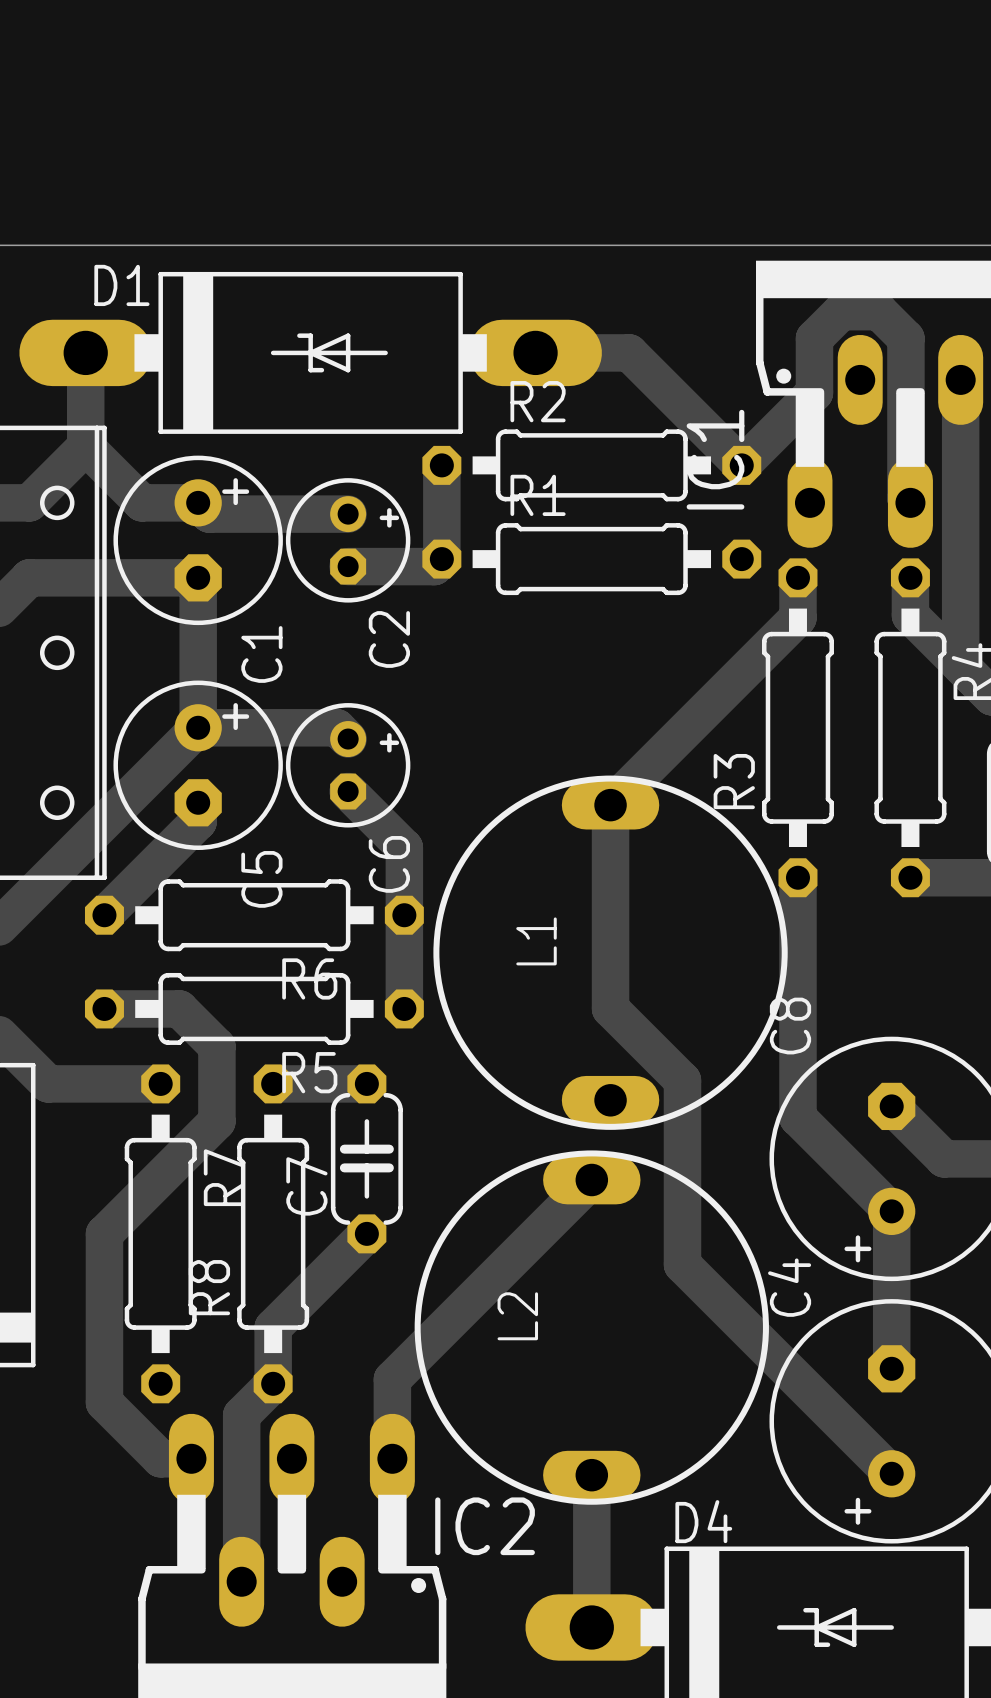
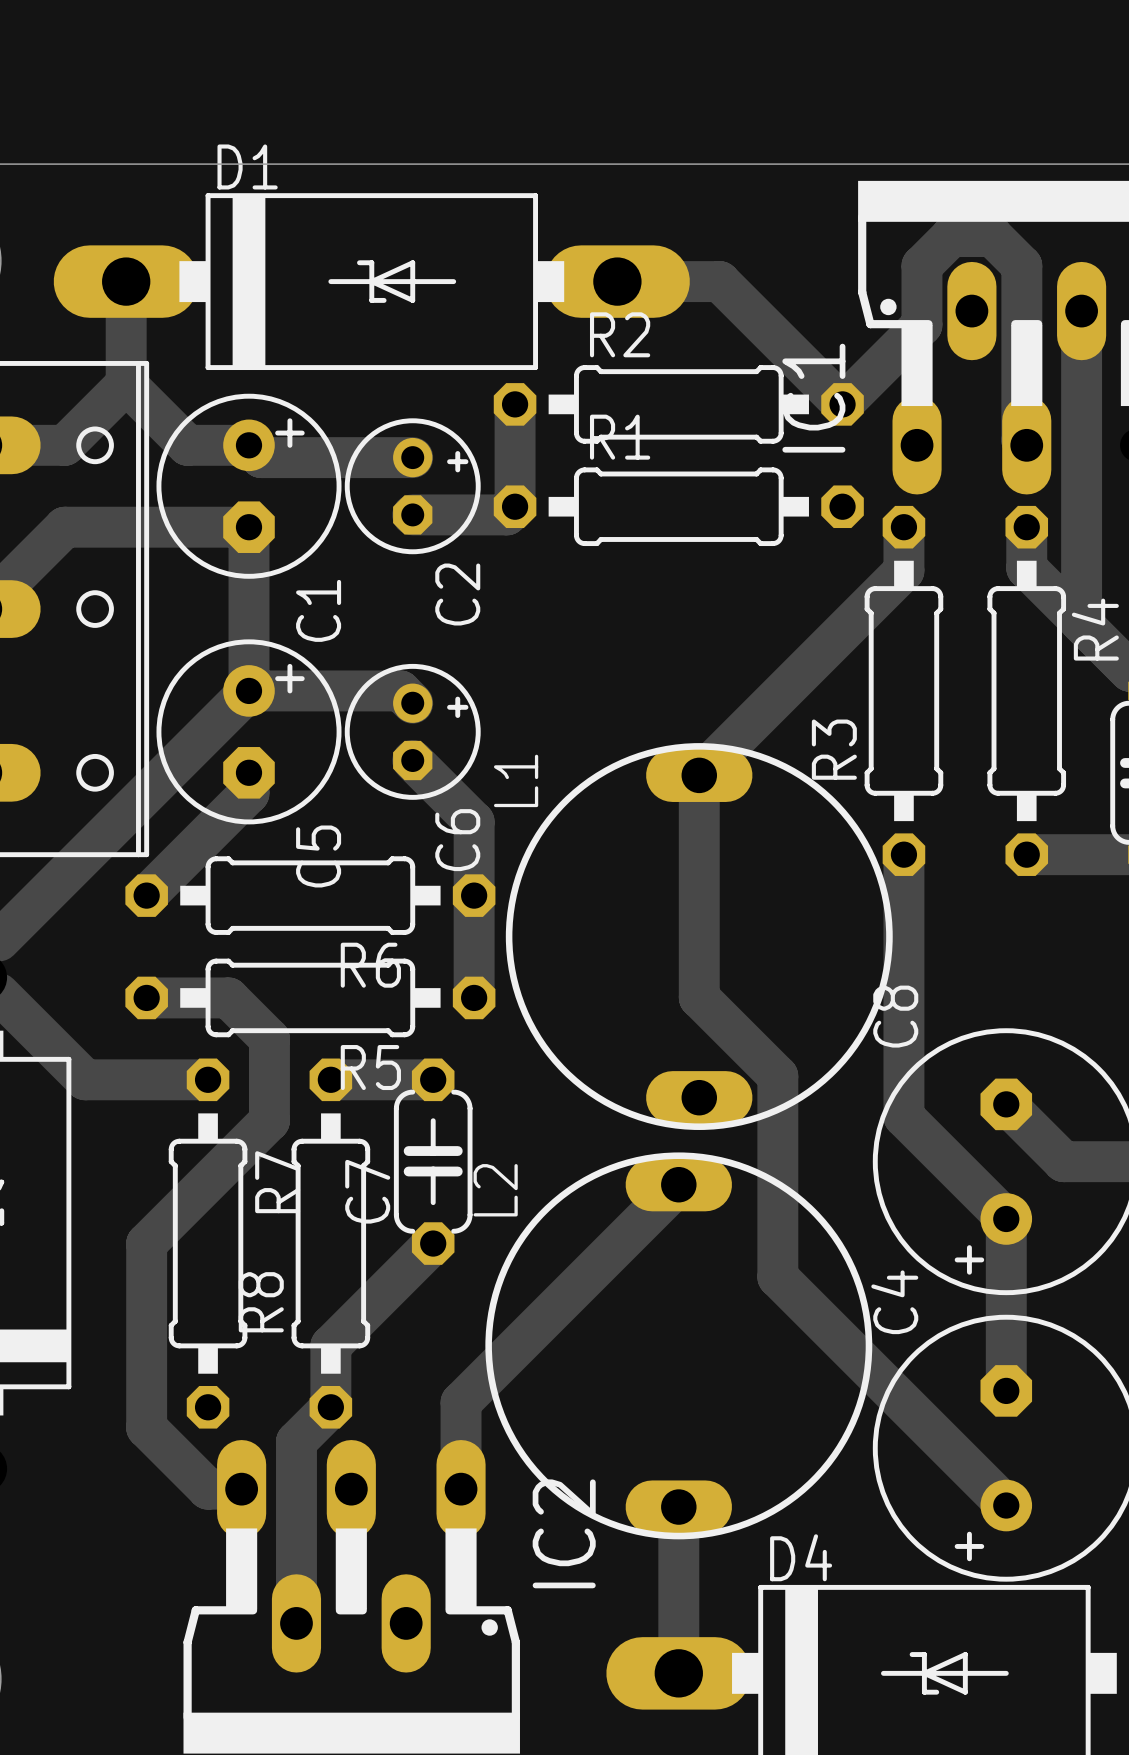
D1 name position: D1 (121, 285) -> D1 (247, 166)
L1 name position: L1 (536, 941) -> L1 (516, 780)
L2 name position: L2 (517, 1316) -> L2 (495, 1190)
IC2 name rotation: 0° (485, 1526) -> 90° counterclockwise (564, 1533)

